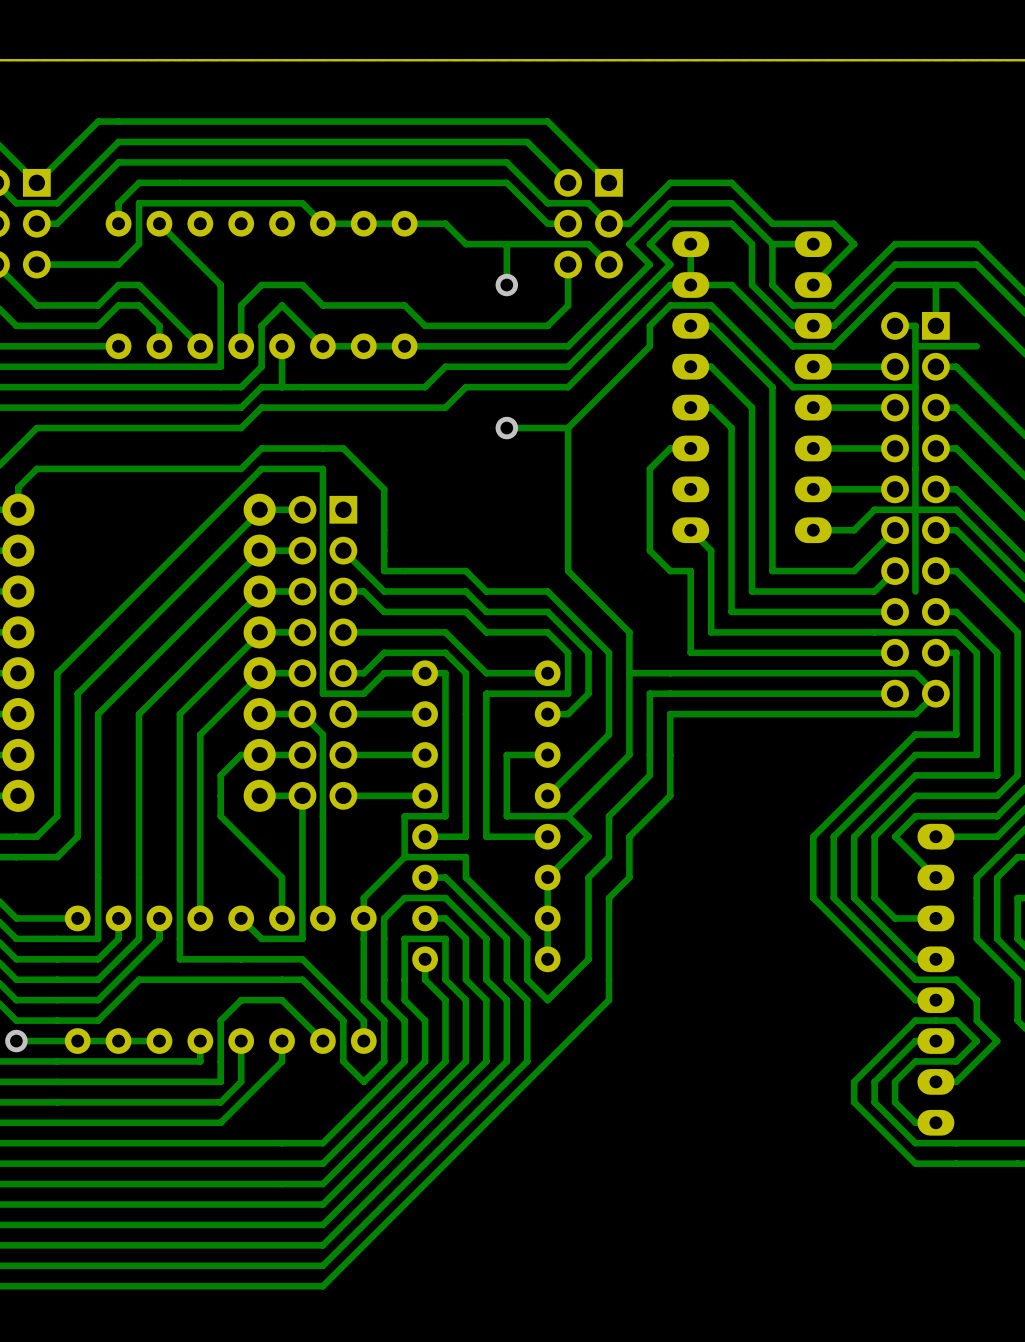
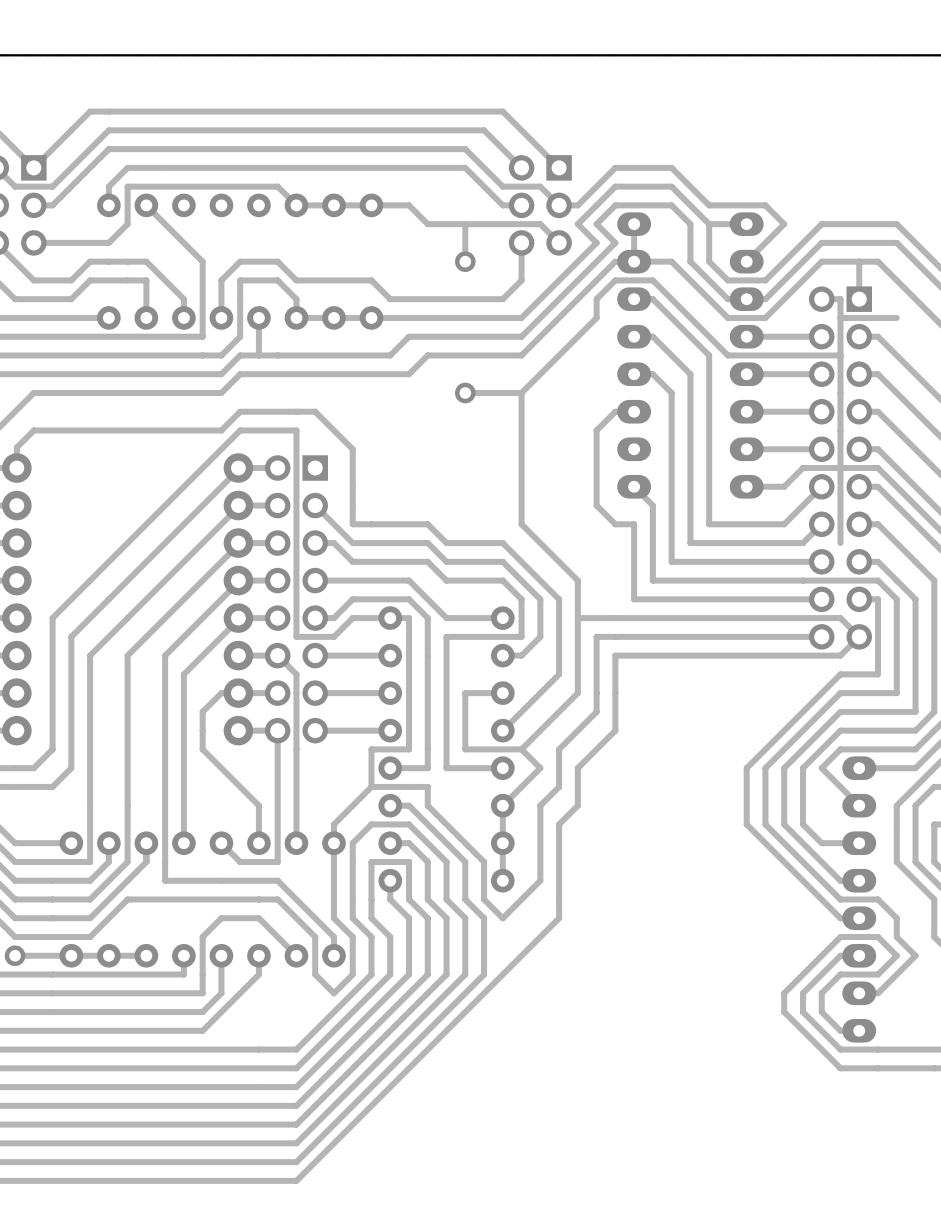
track: (118, 285) (98, 305) (77, 305) -> (108, 261) (90, 261) (71, 280)
track: (139, 285) (200, 346) -> (127, 261) (146, 261) (183, 299) (183, 317)
track: (118, 305) (98, 325) (77, 325) -> (108, 280) (90, 280) (71, 299)
track: (139, 305) (159, 325) -> (127, 280) (146, 280) (146, 299)
track: (261, 325) (282, 305) (322, 346) -> (240, 299) (240, 280) (277, 280) (296, 299) (296, 317)

